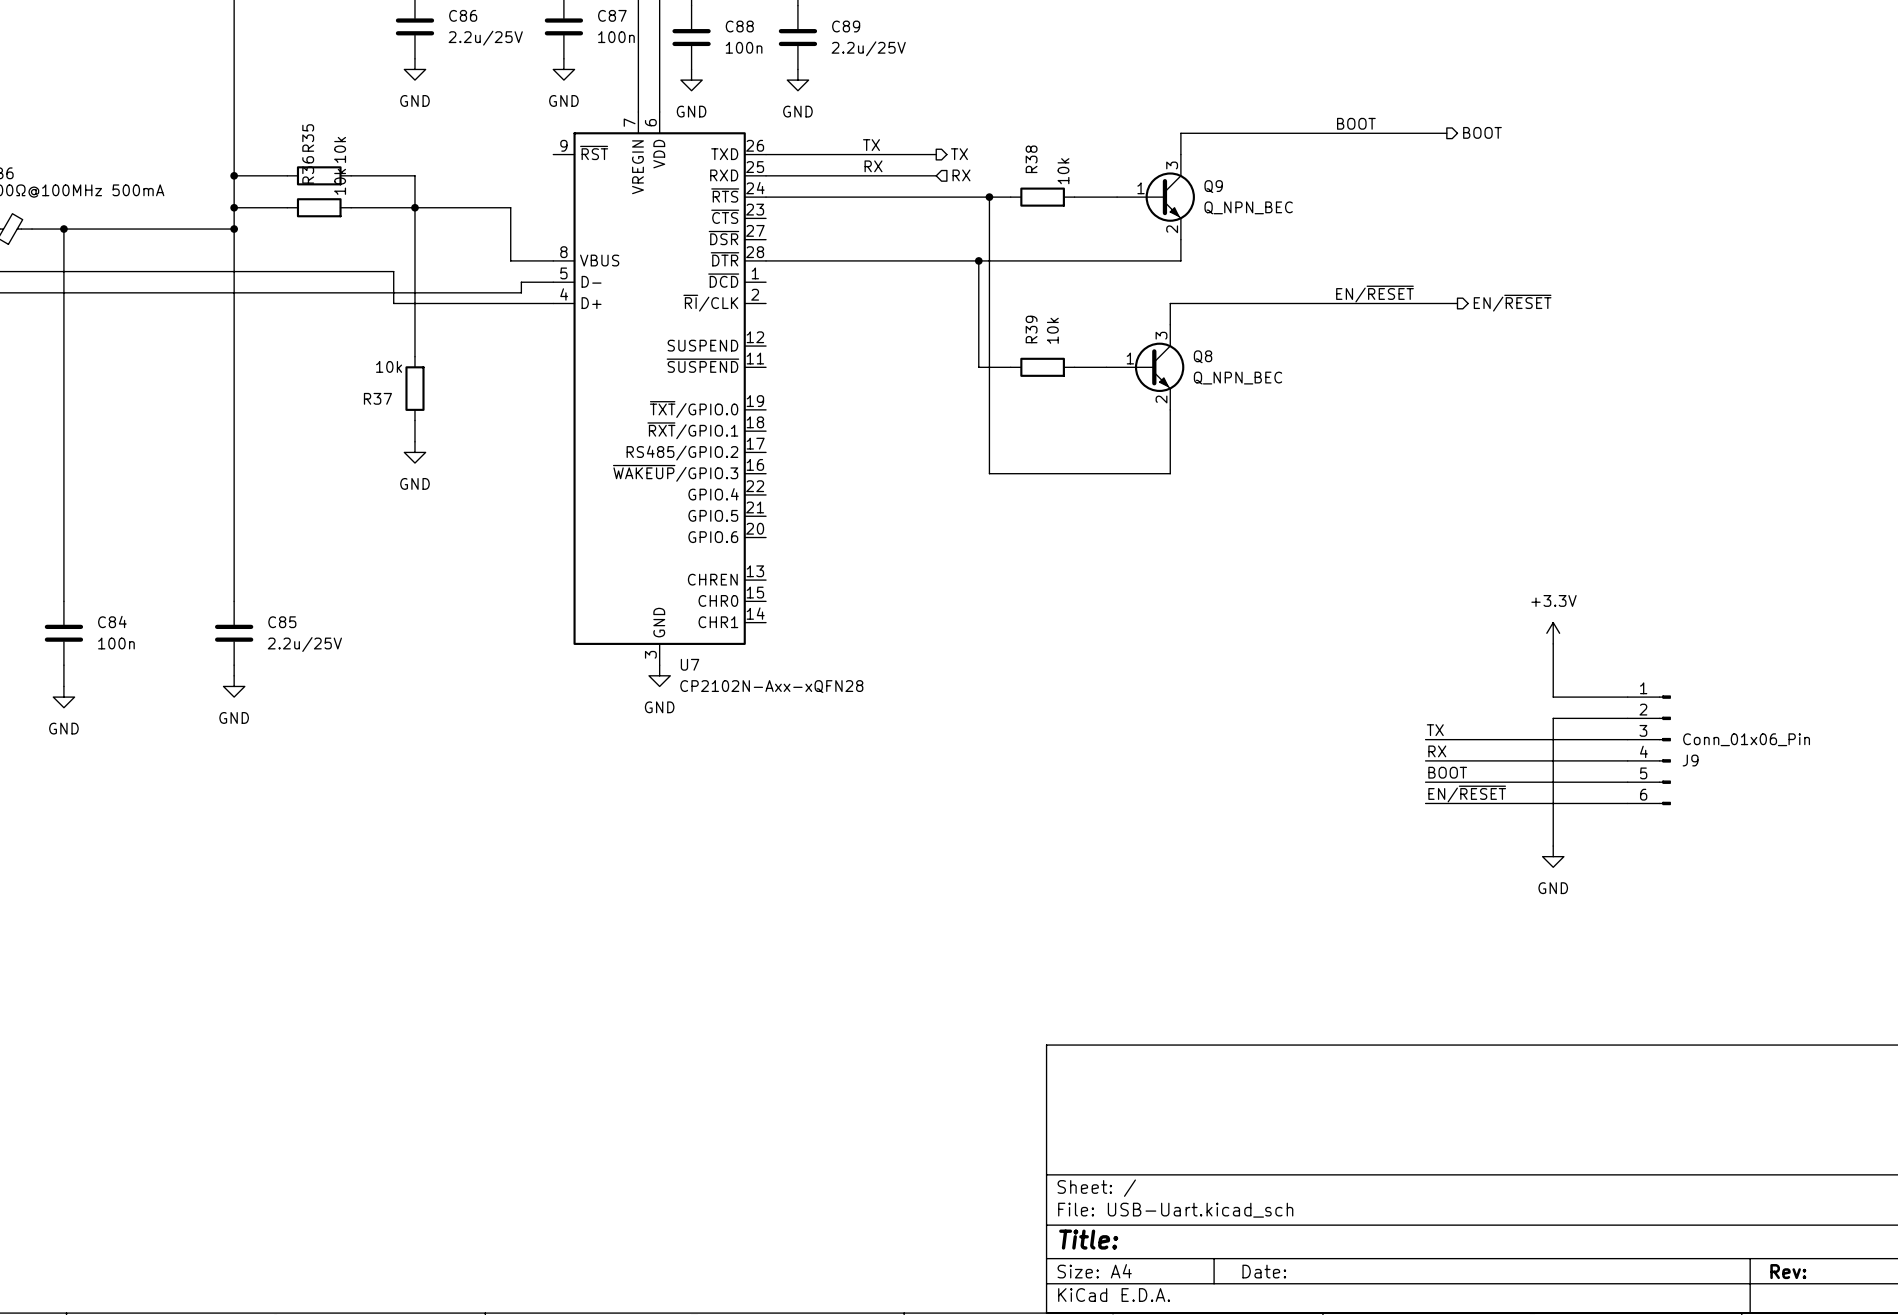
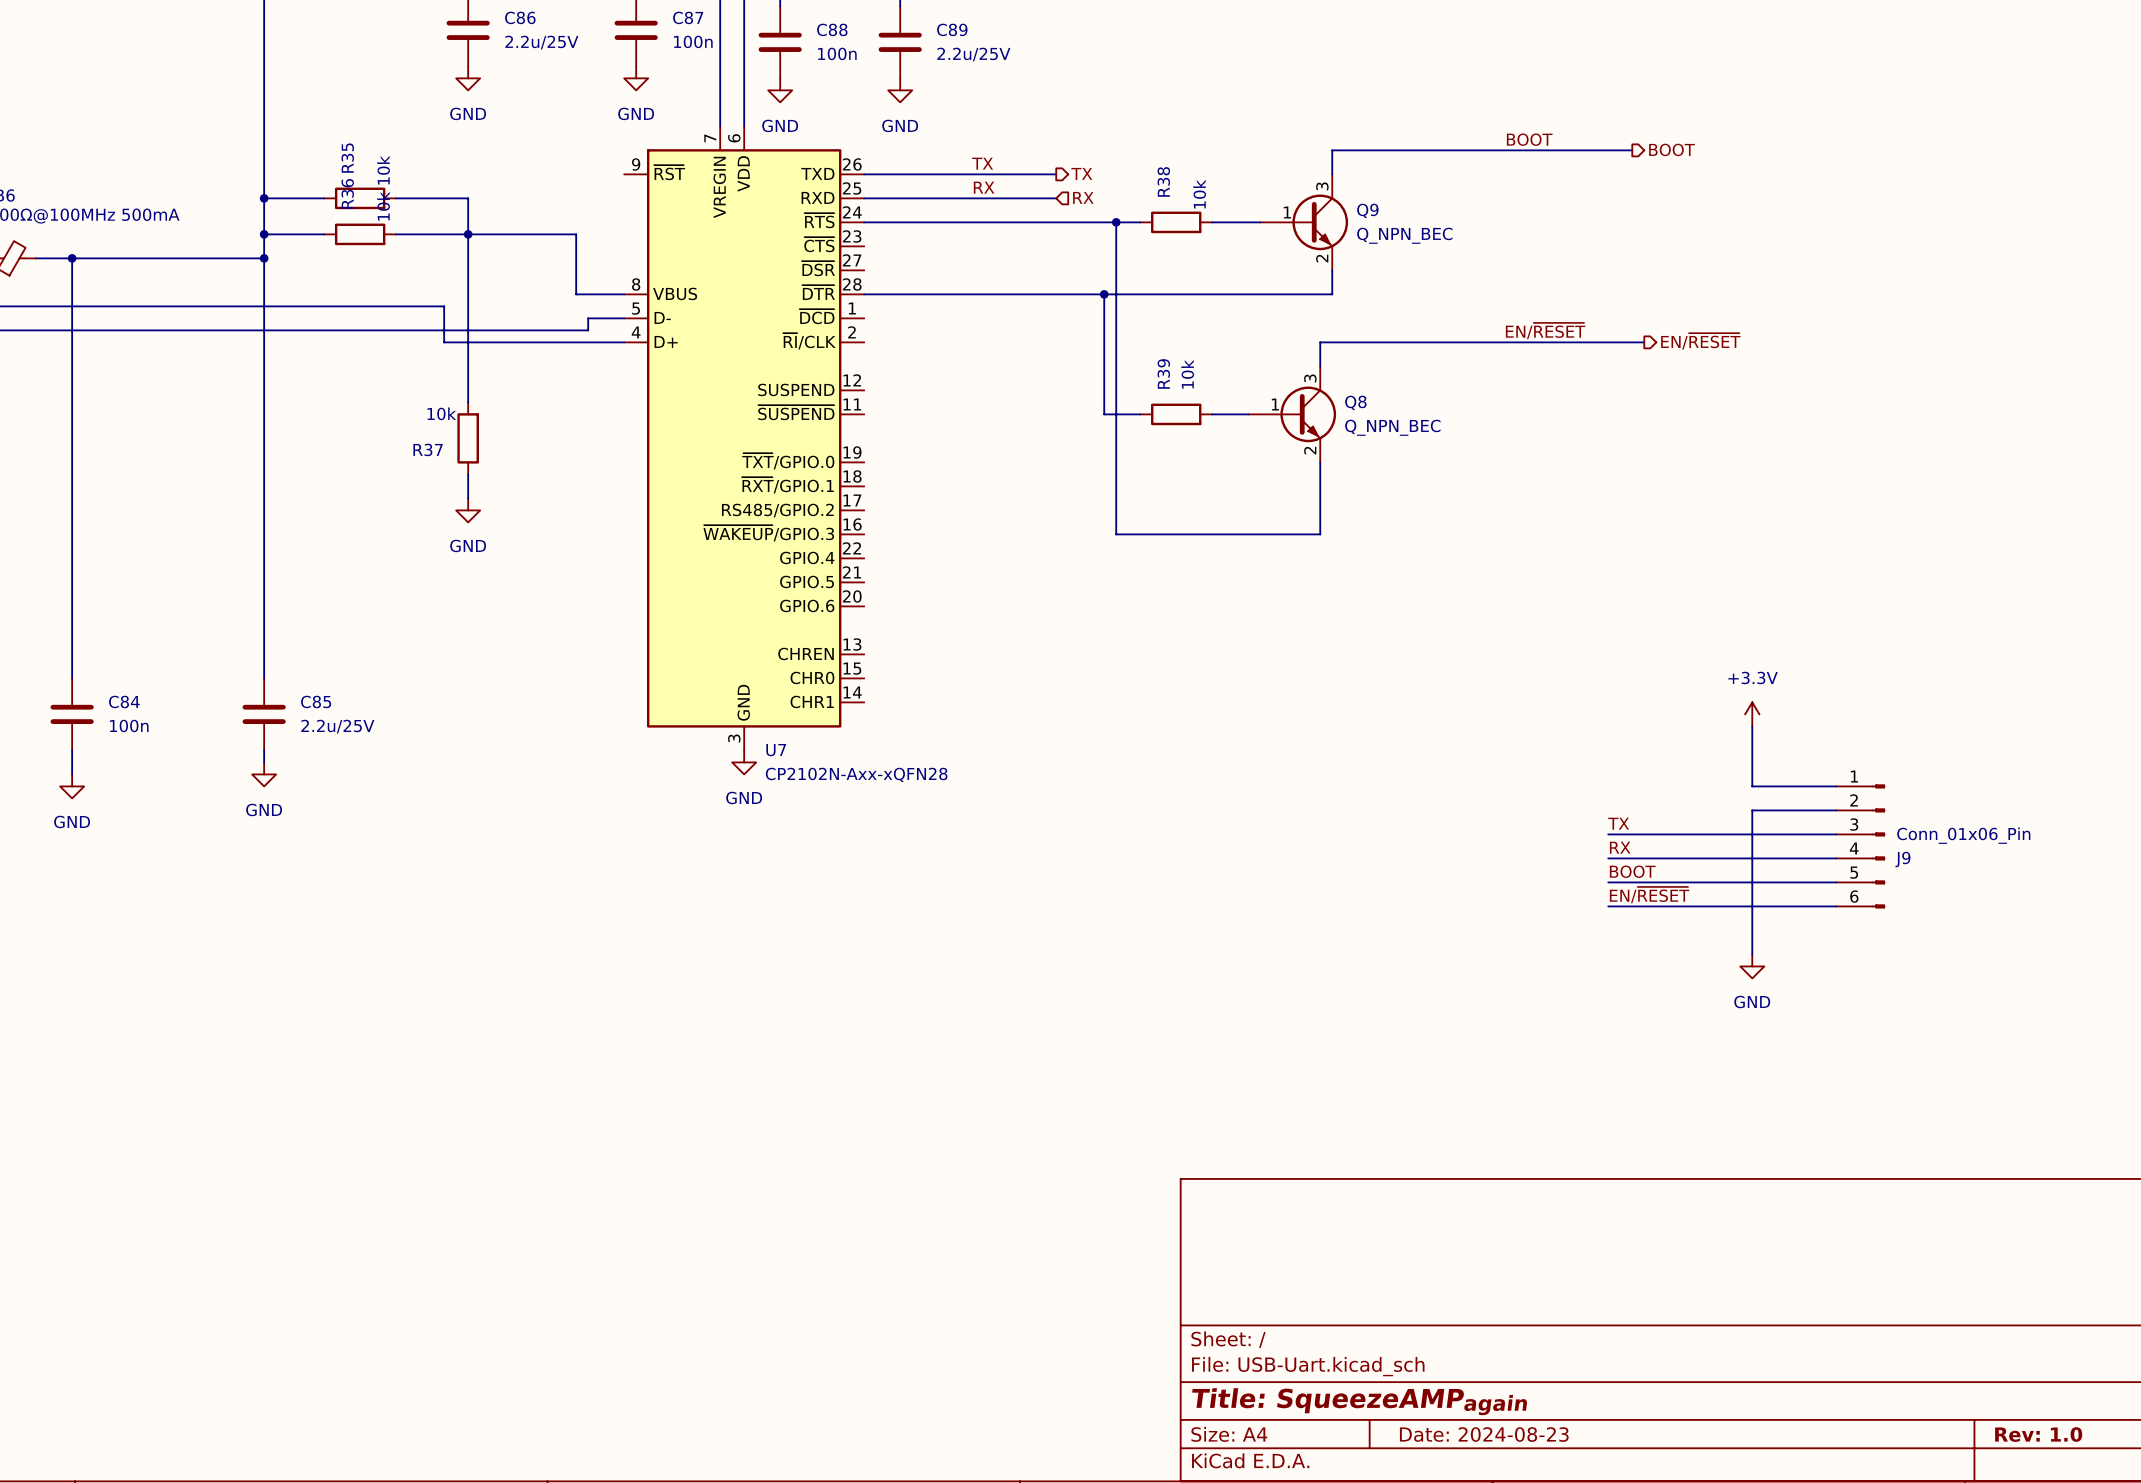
title block: Title: (1088, 1239) -> Title: SqueezeAMPagain (1359, 1401)
title block: Date: (1264, 1271) -> Date: 2024-08-23 (1484, 1434)
title block: Rev: (1788, 1271) -> Rev: 1.0 (2038, 1434)

